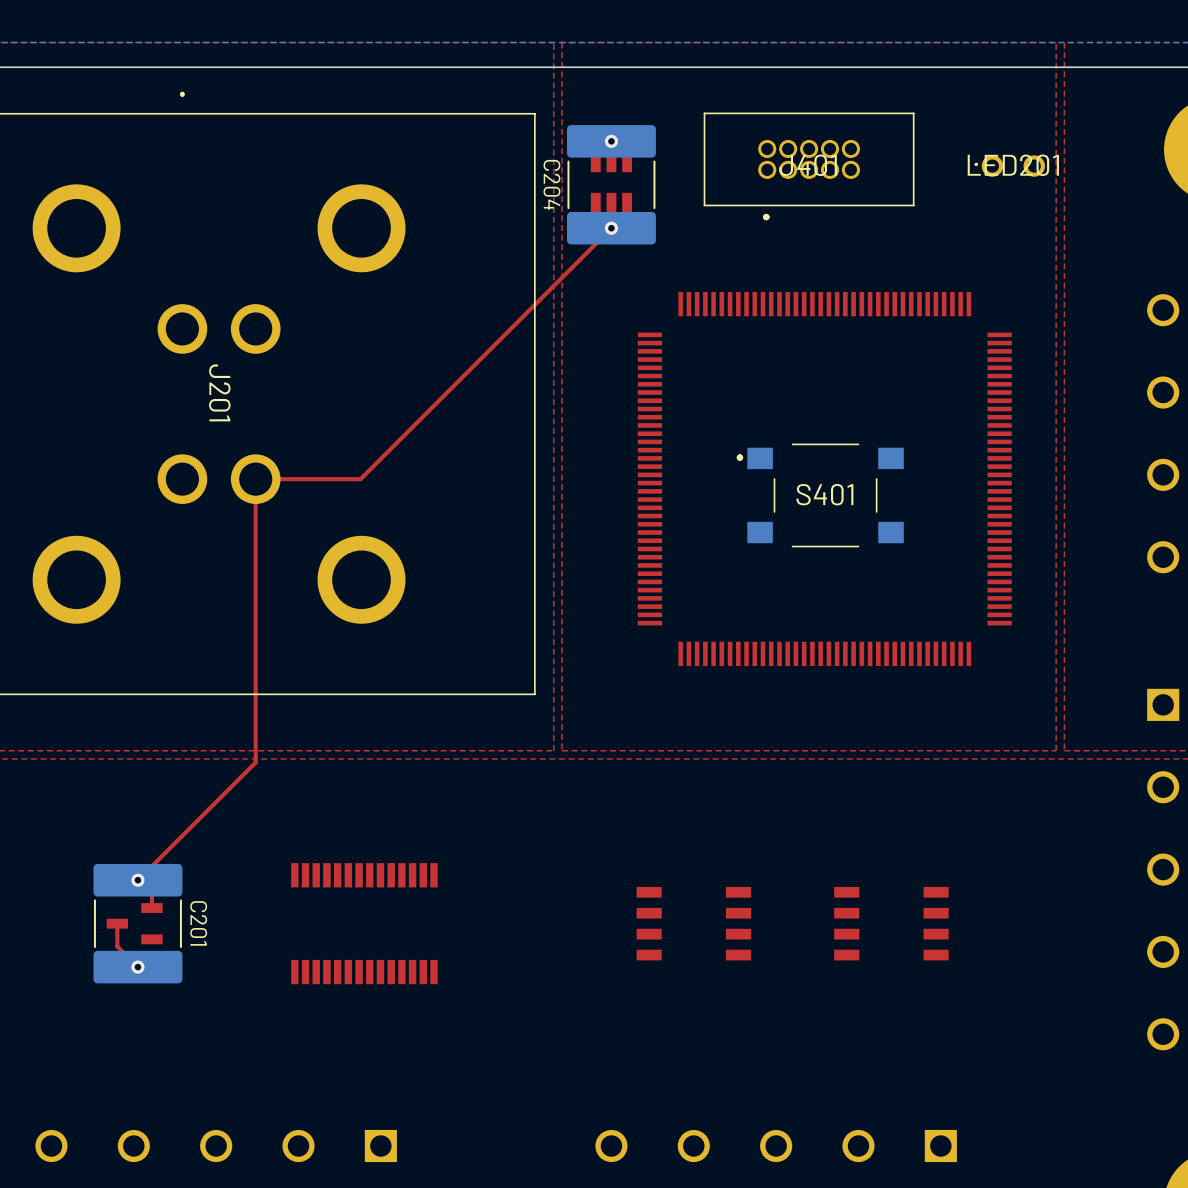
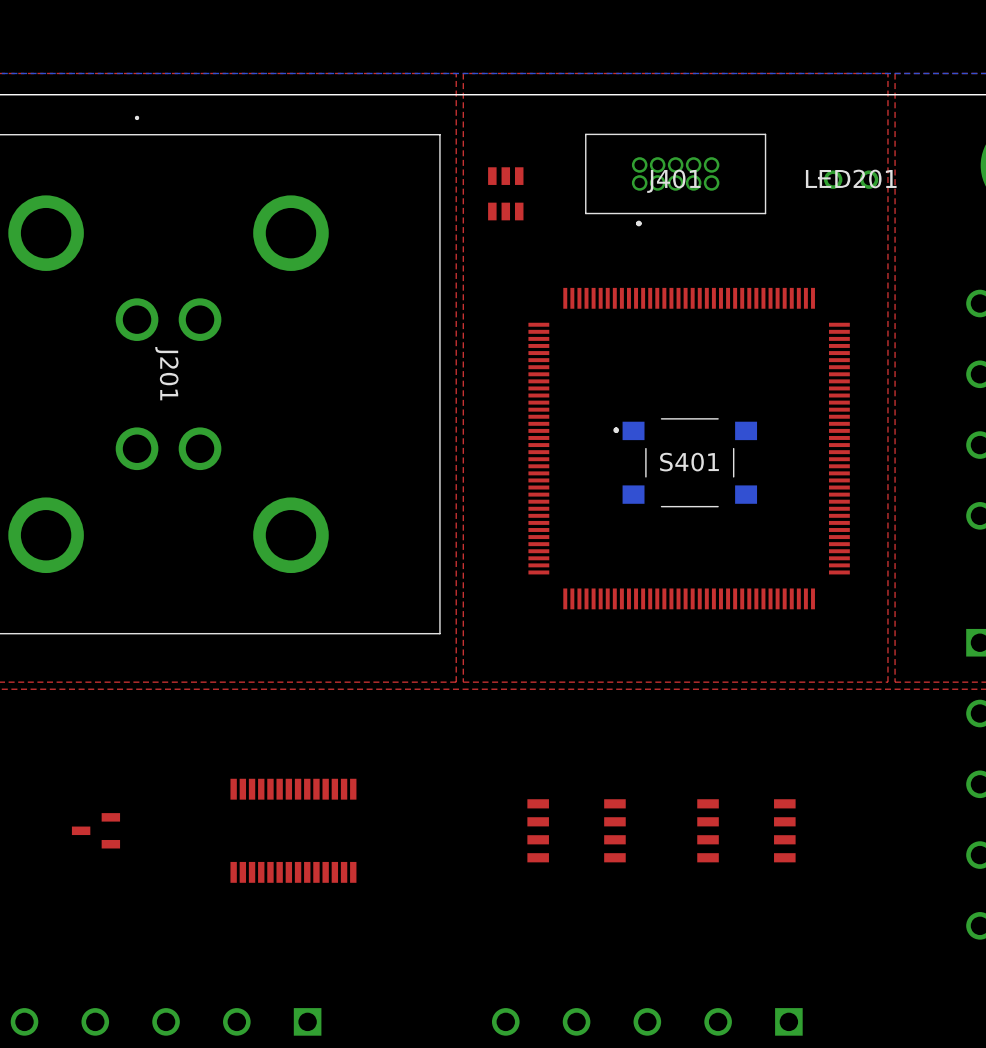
via: (611, 141) -> none
C204: (611, 184) -> none
top track: (627, 203) (627, 212) (360, 479) (255, 479) (255, 762) (137, 880) (151, 894) (151, 908) -> none
via: (611, 228) -> none
via: (137, 880) -> none
top track: (117, 923) (117, 946) (137, 967) -> none
C201: (137, 923) -> none
via: (137, 967) -> none

